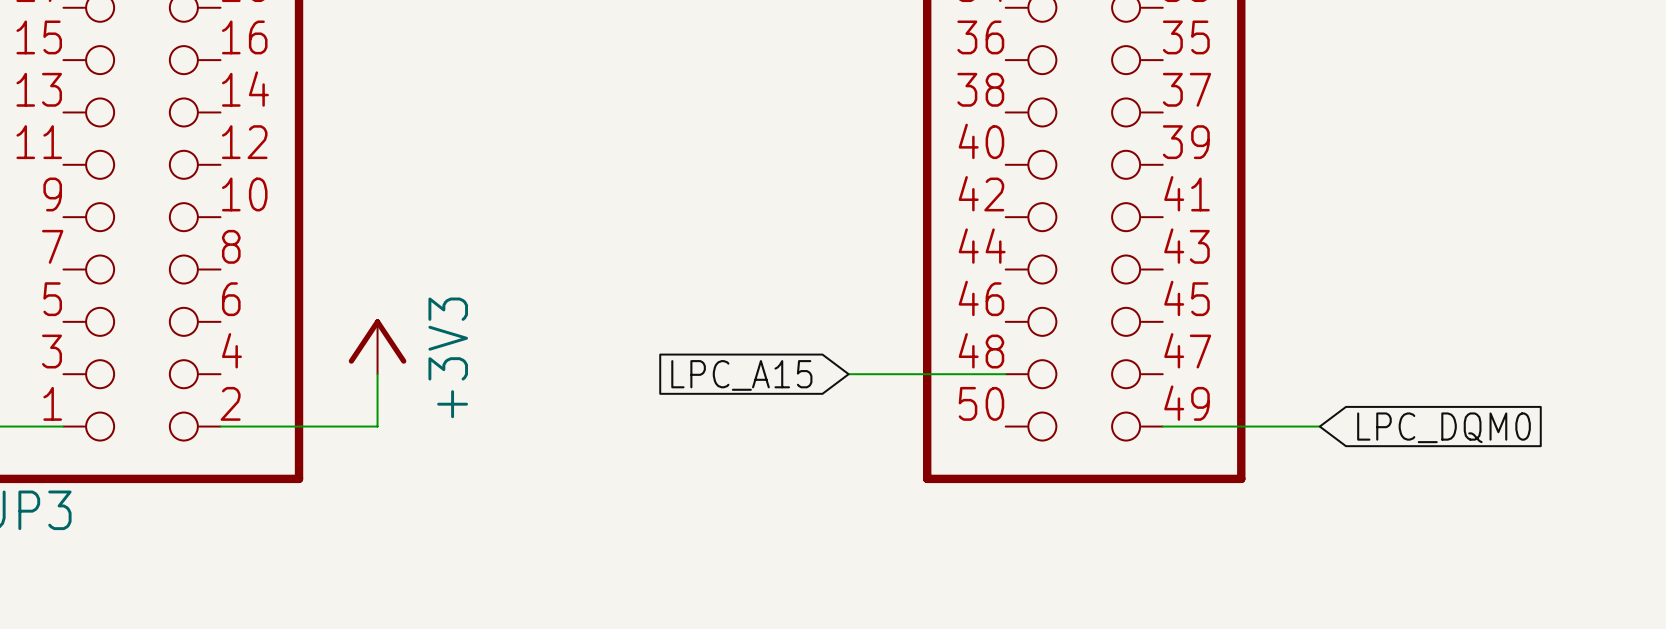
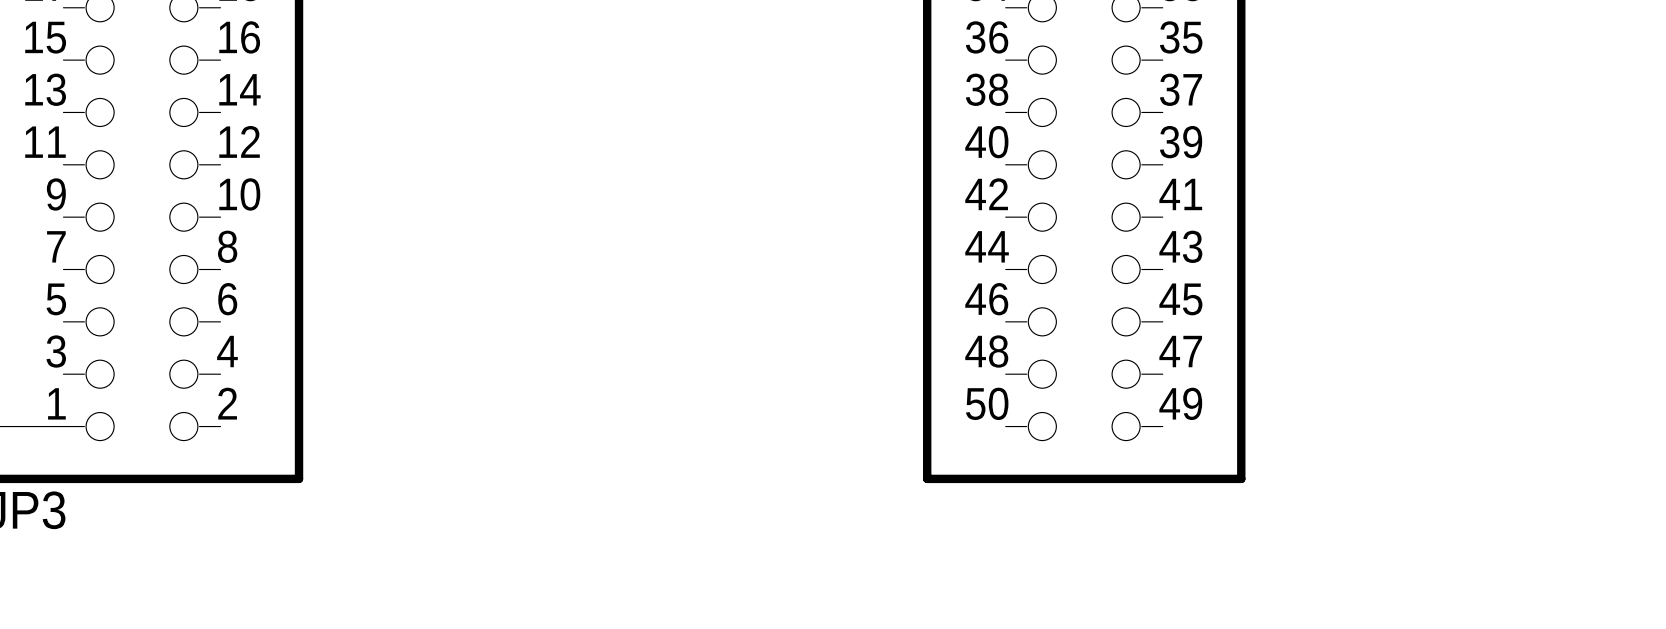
power symbol: +3V3 (377, 346) -> none
wire: (377, 374) (377, 426) (220, 426) -> none
wire: (848, 374) (1005, 374) -> none
global label: LPC_A15 (741, 375) -> none
wire: (1162, 426) (1319, 426) -> none
global label: LPC_DQM0 (1444, 427) -> none

